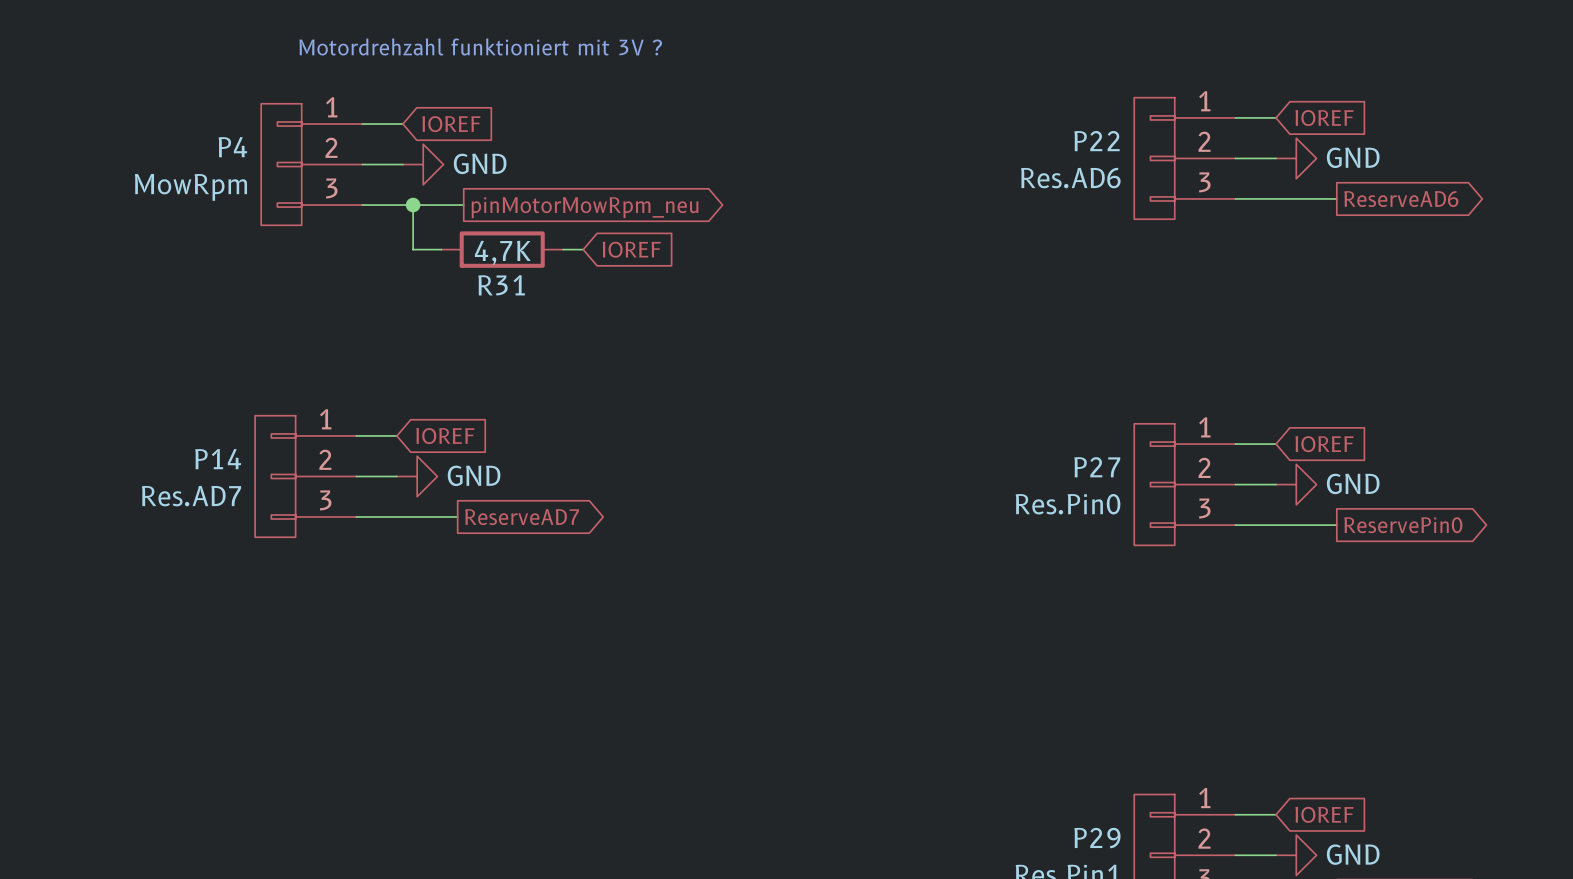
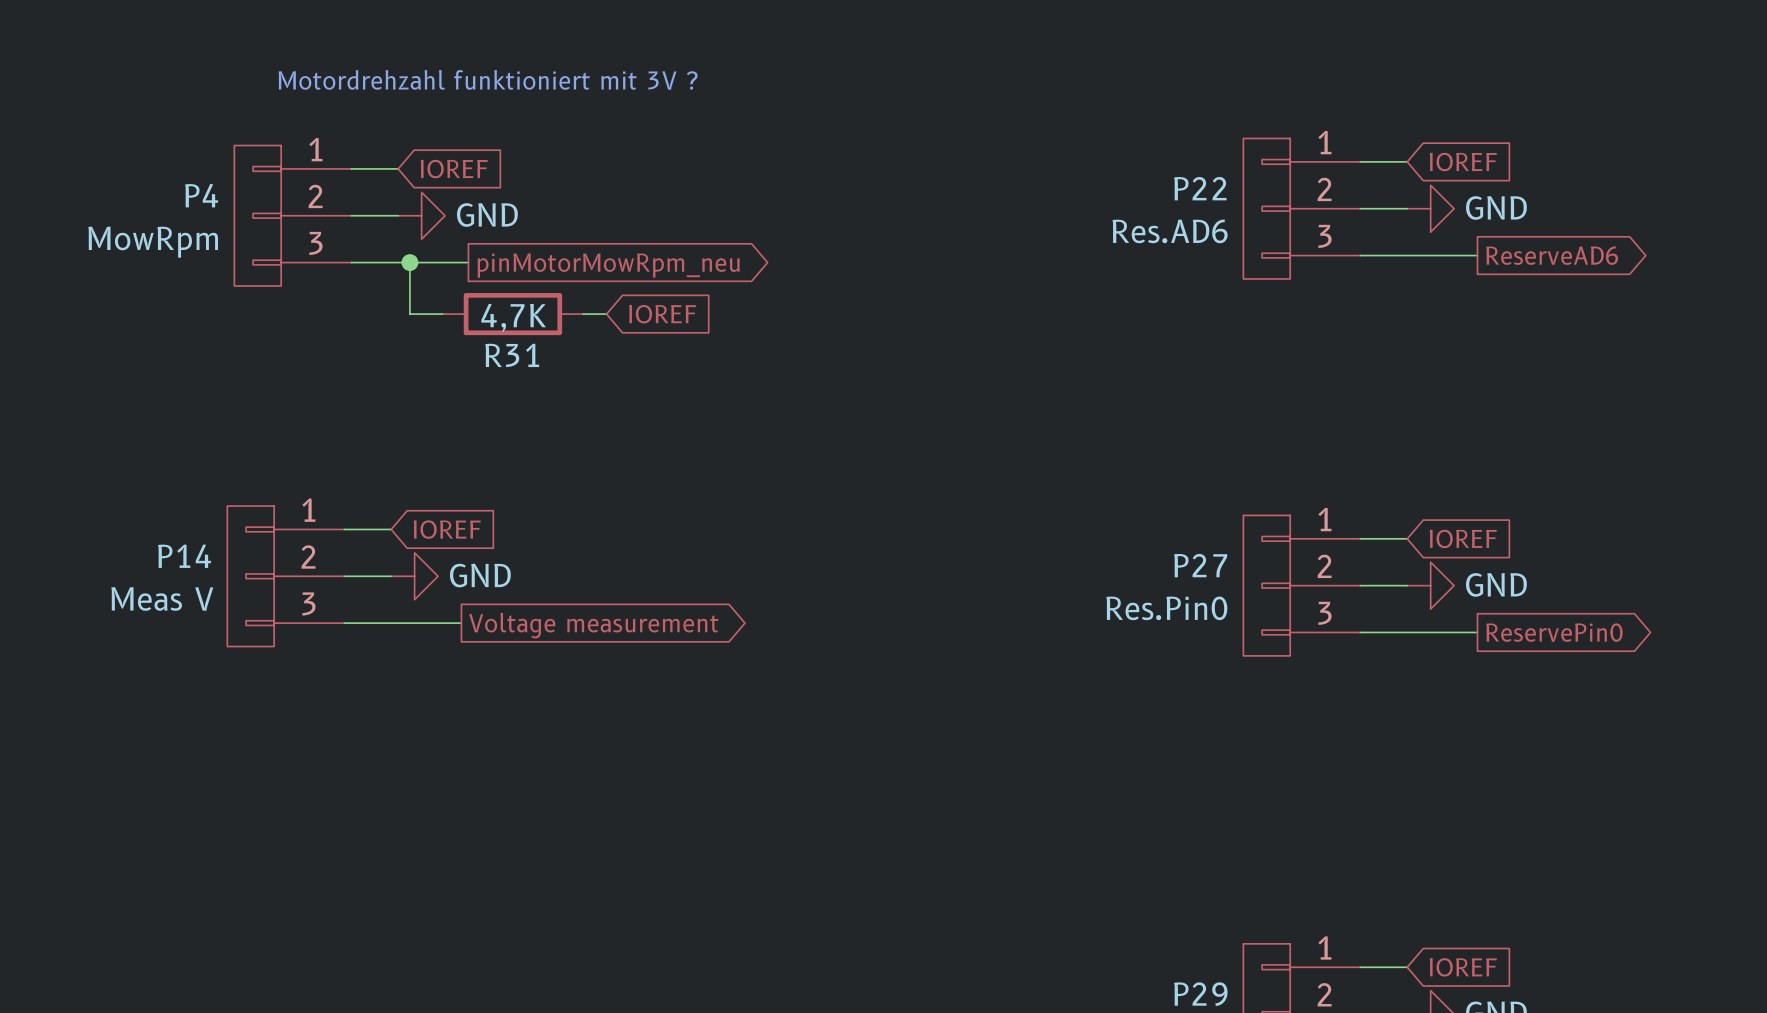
P14 value: Res.AD7 (191, 496) -> Meas V (162, 598)
global label: ReserveAD7 (522, 517) -> Voltage measurement (593, 625)

